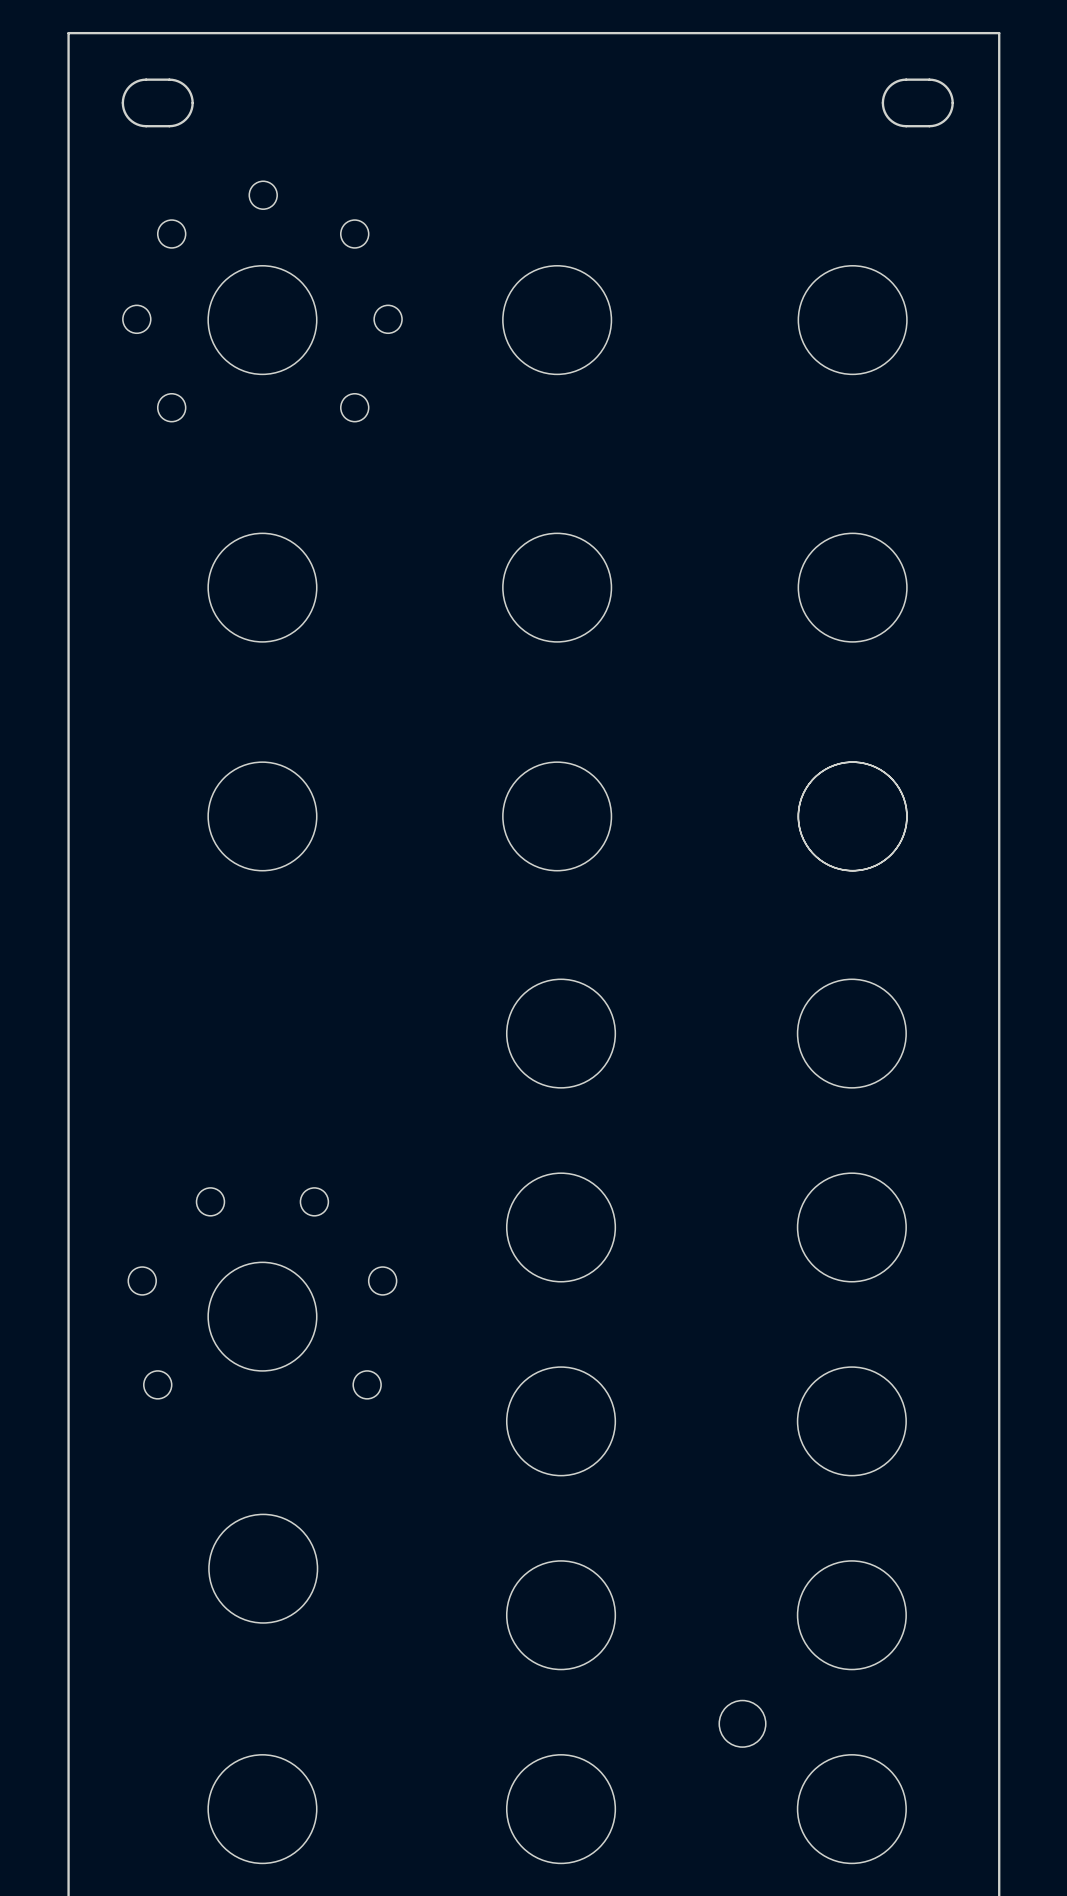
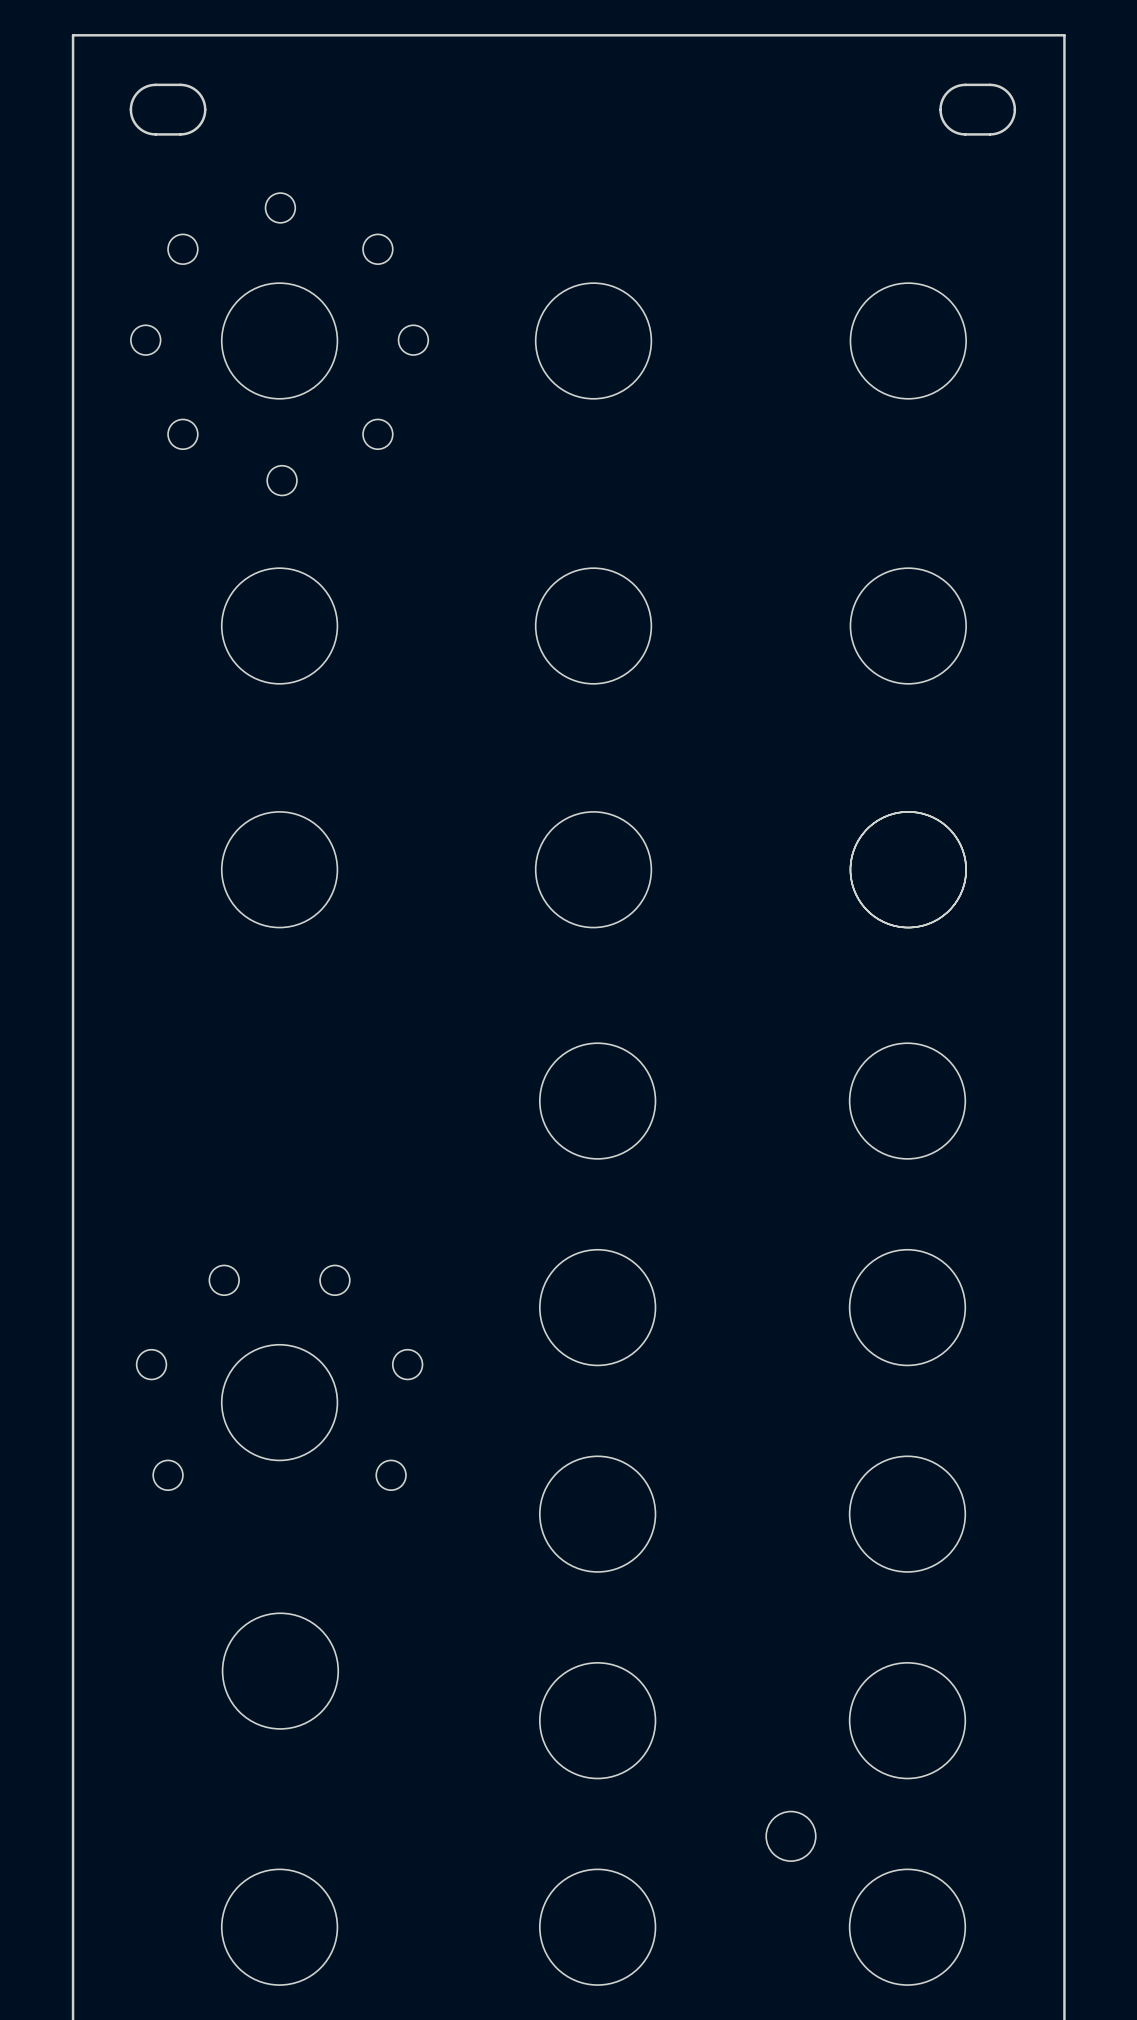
round board edge: none -> [266, 464, 298, 497]

